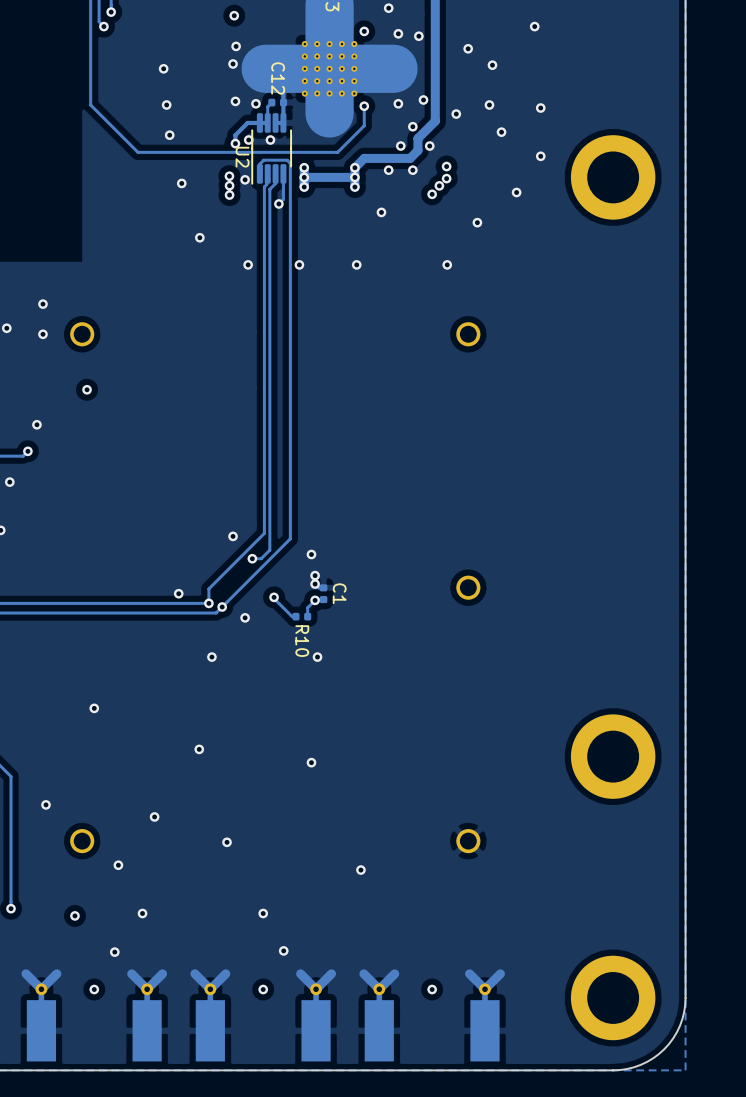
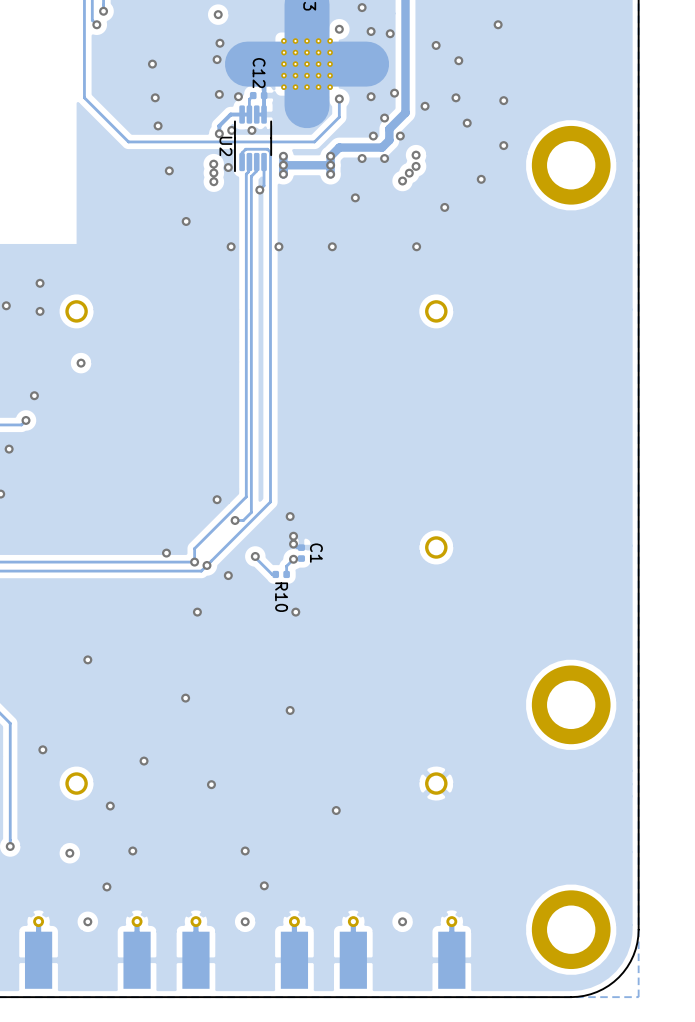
track: (56, 973) (41, 989) (25, 973) -> none
track: (162, 973) (147, 989) (131, 973) -> none
track: (225, 973) (210, 989) (194, 973) -> none
track: (331, 973) (316, 989) (300, 973) -> none
track: (394, 973) (379, 989) (363, 973) -> none
track: (500, 973) (485, 989) (469, 973) -> none

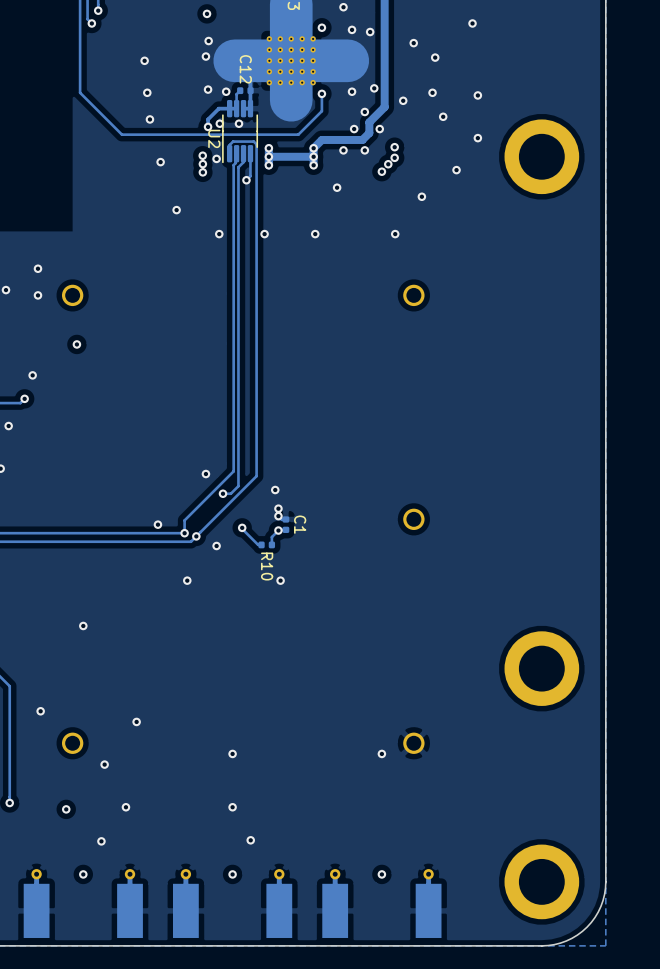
via: (185, 698) -> none
via: (290, 710) -> none
via position: (211, 784) -> (232, 753)
via: none -> (381, 753)
via: (336, 810) -> none

